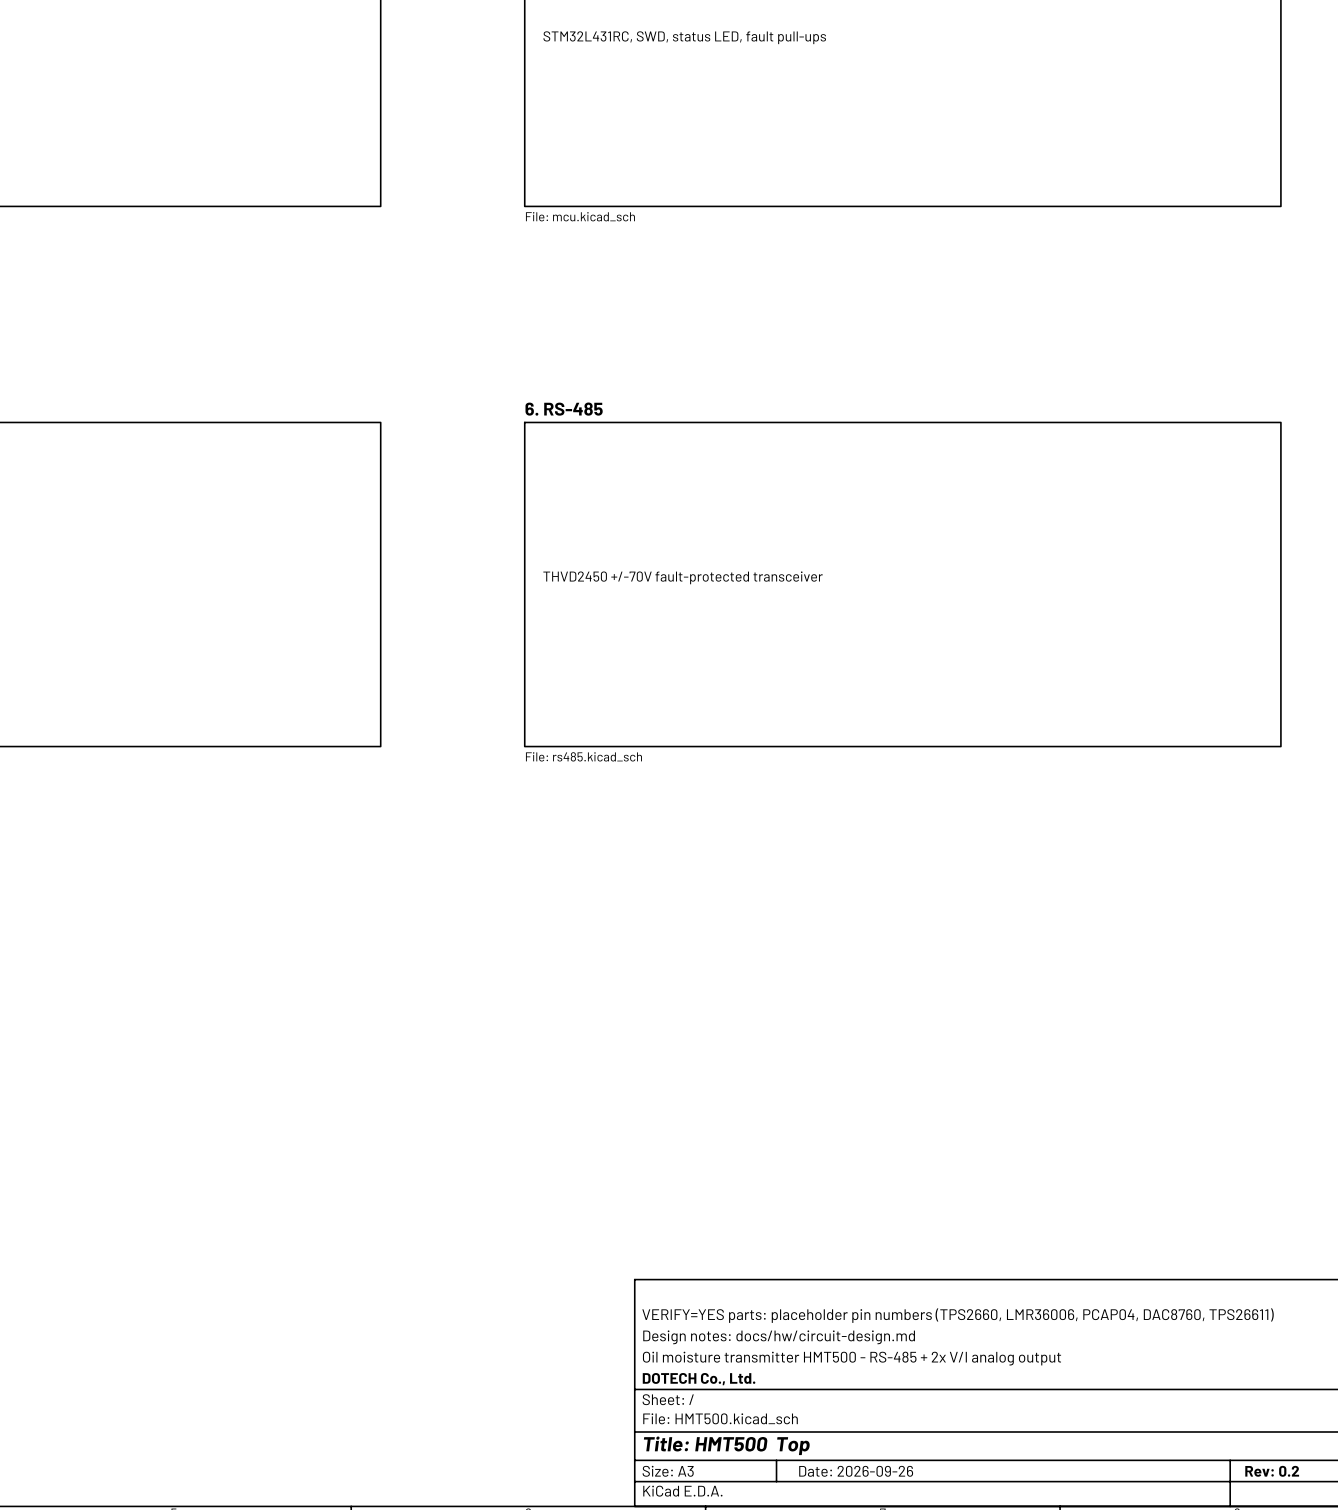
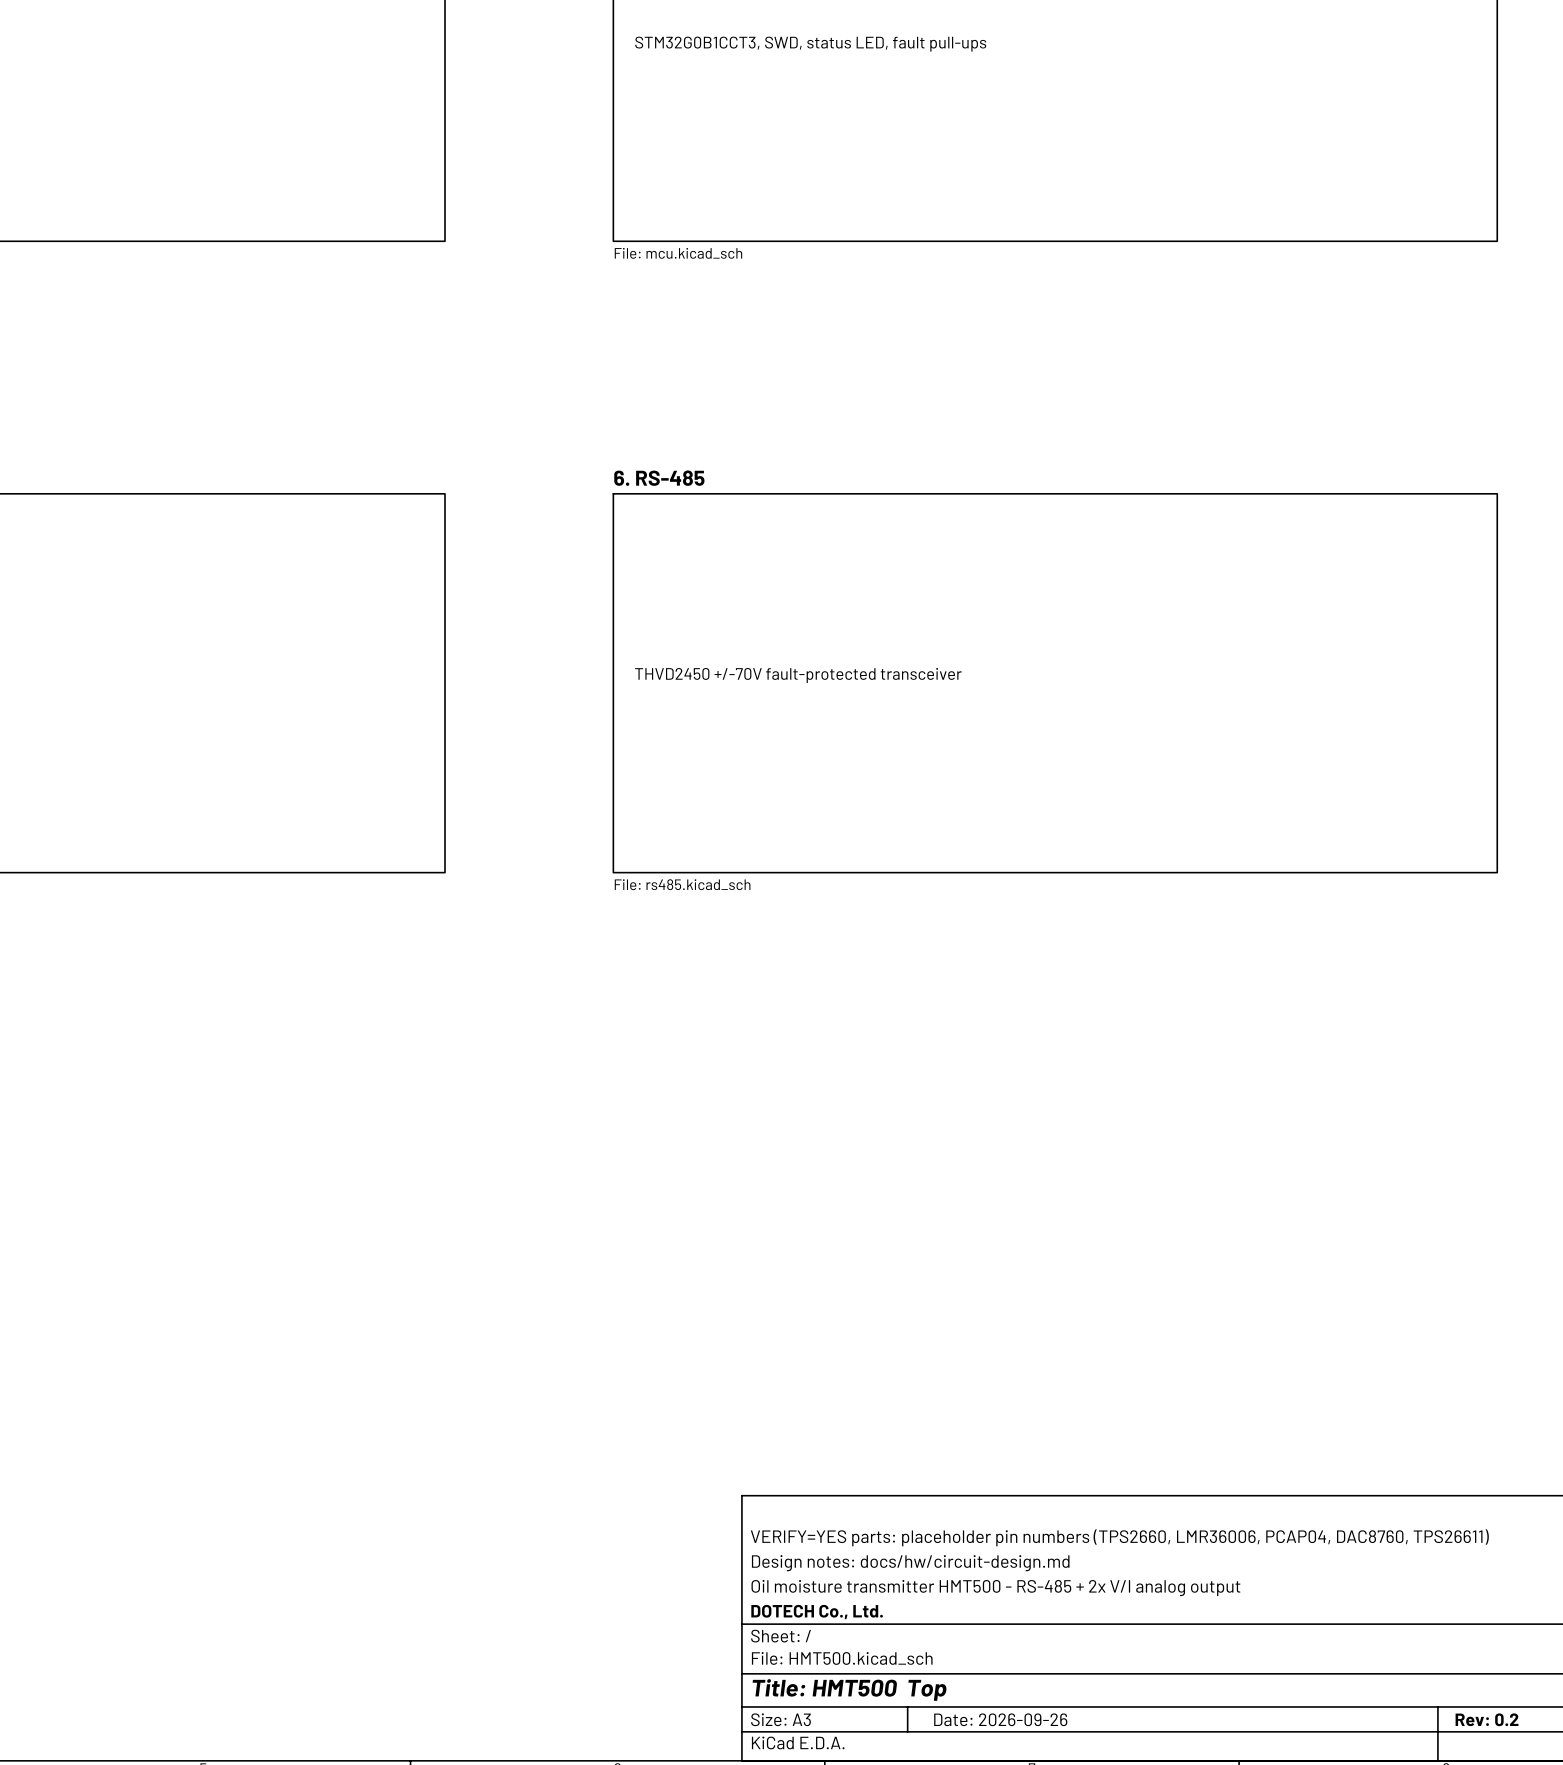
text: STM32L431RC, SWD, status LED, fault pull-ups (684, 37) -> STM32G0B1CCT3, SWD, status LED, fault pull-ups (810, 44)

